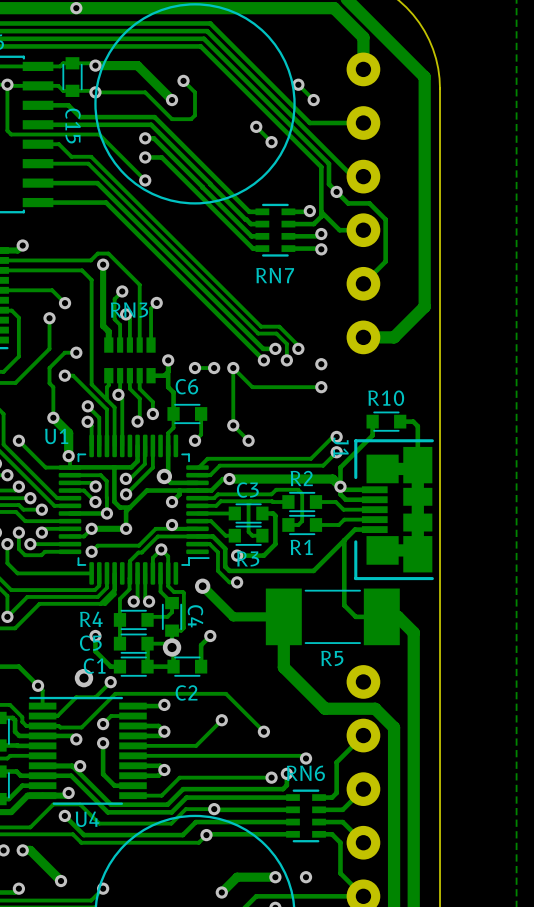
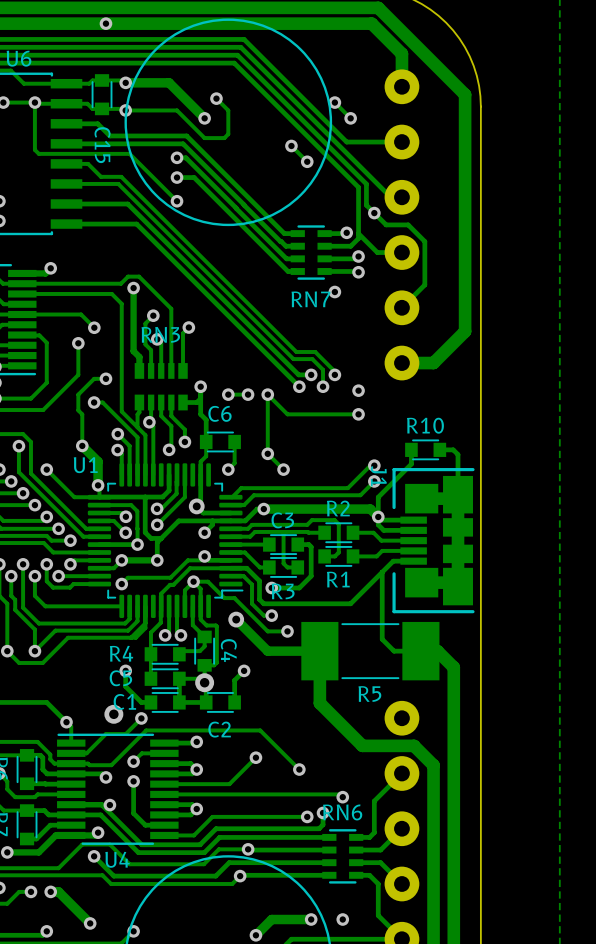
via: none -> (334, 292)
track: none -> (193, 581) (207, 581) (224, 598) (234, 598) (267, 631) (287, 631)
via: none -> (287, 631)

